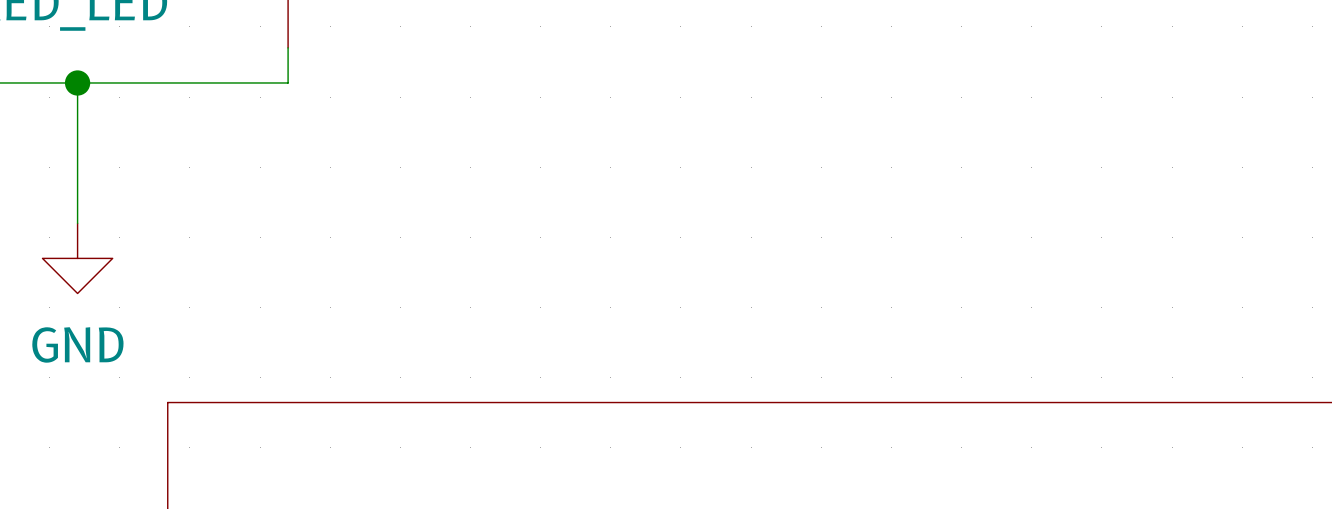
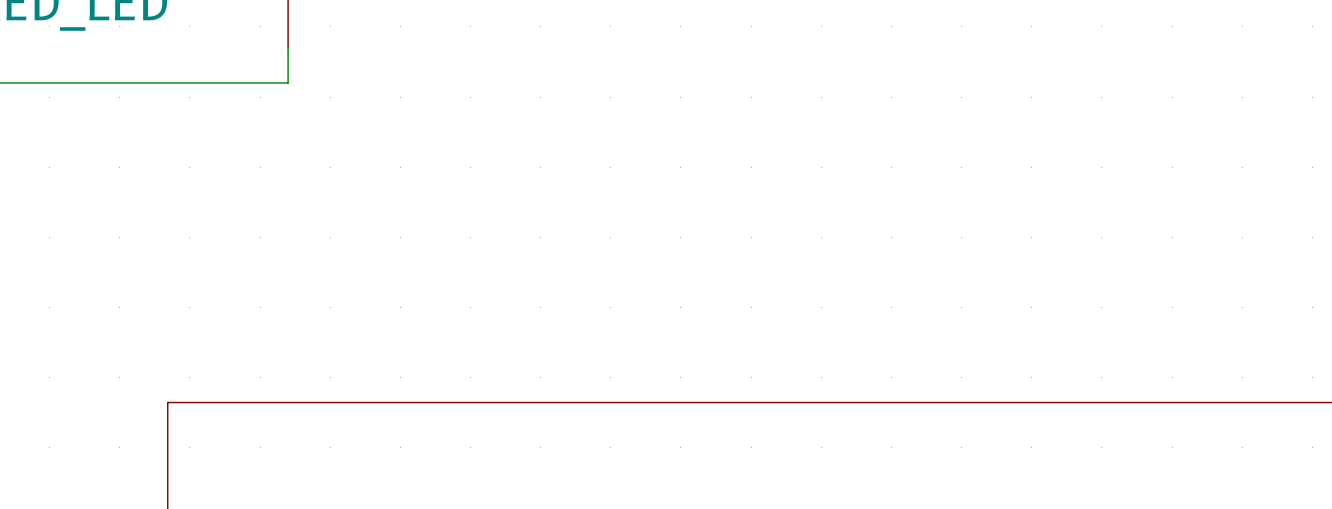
wire: (77, 82) (77, 223) -> none
junction: (77, 82) -> none
power symbol: GND (77, 258) -> none

